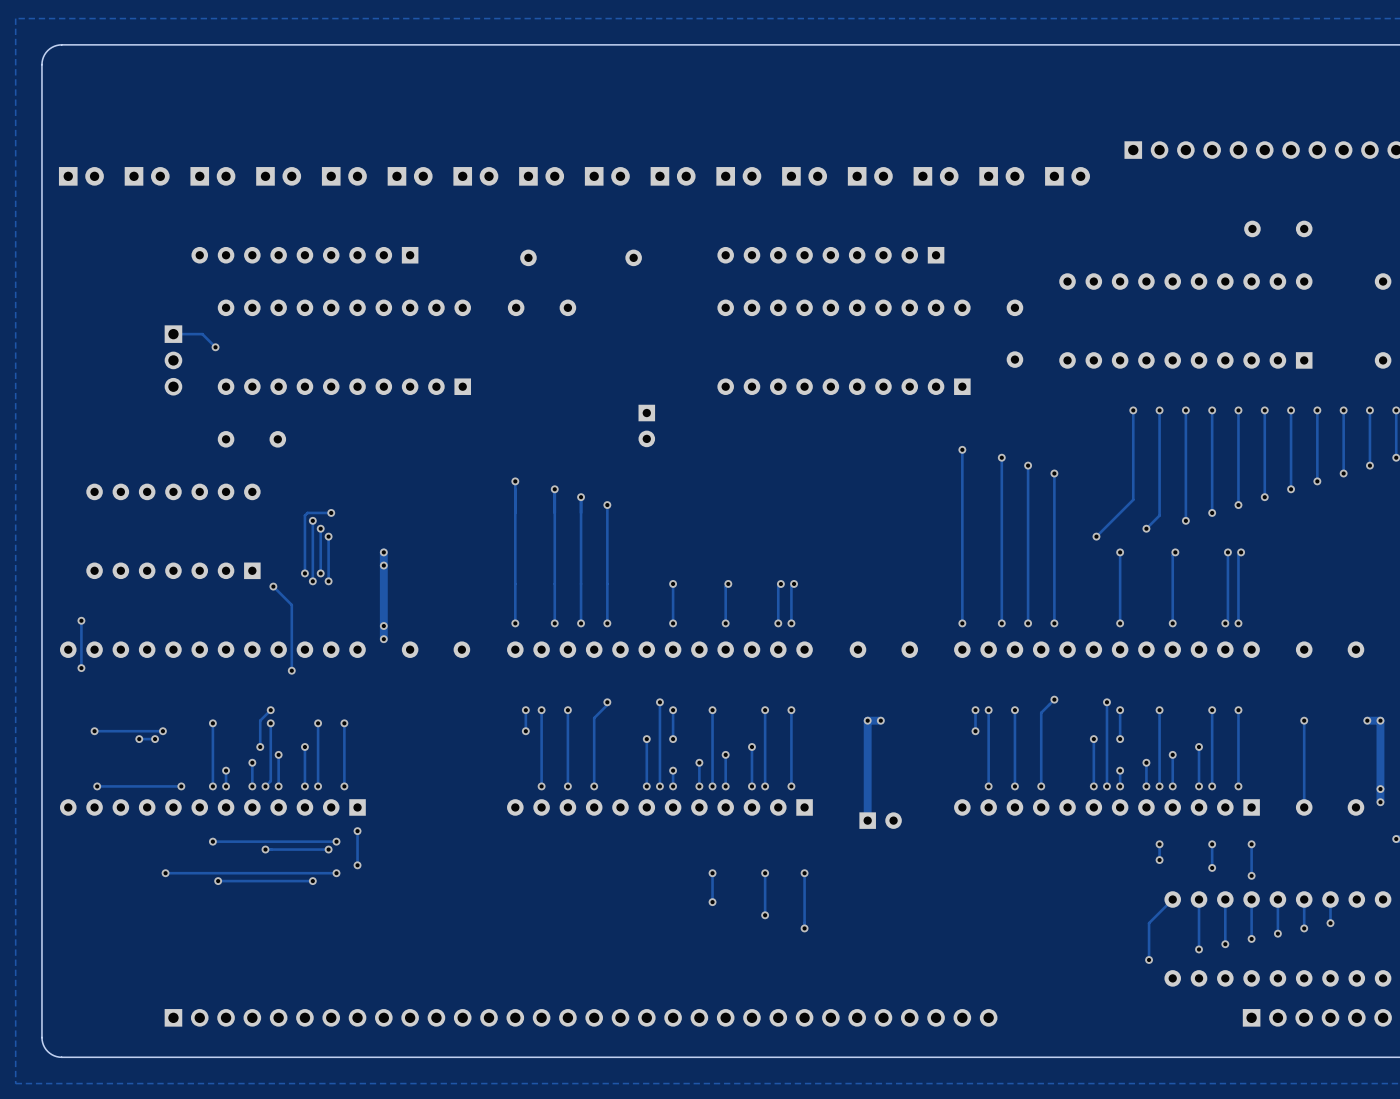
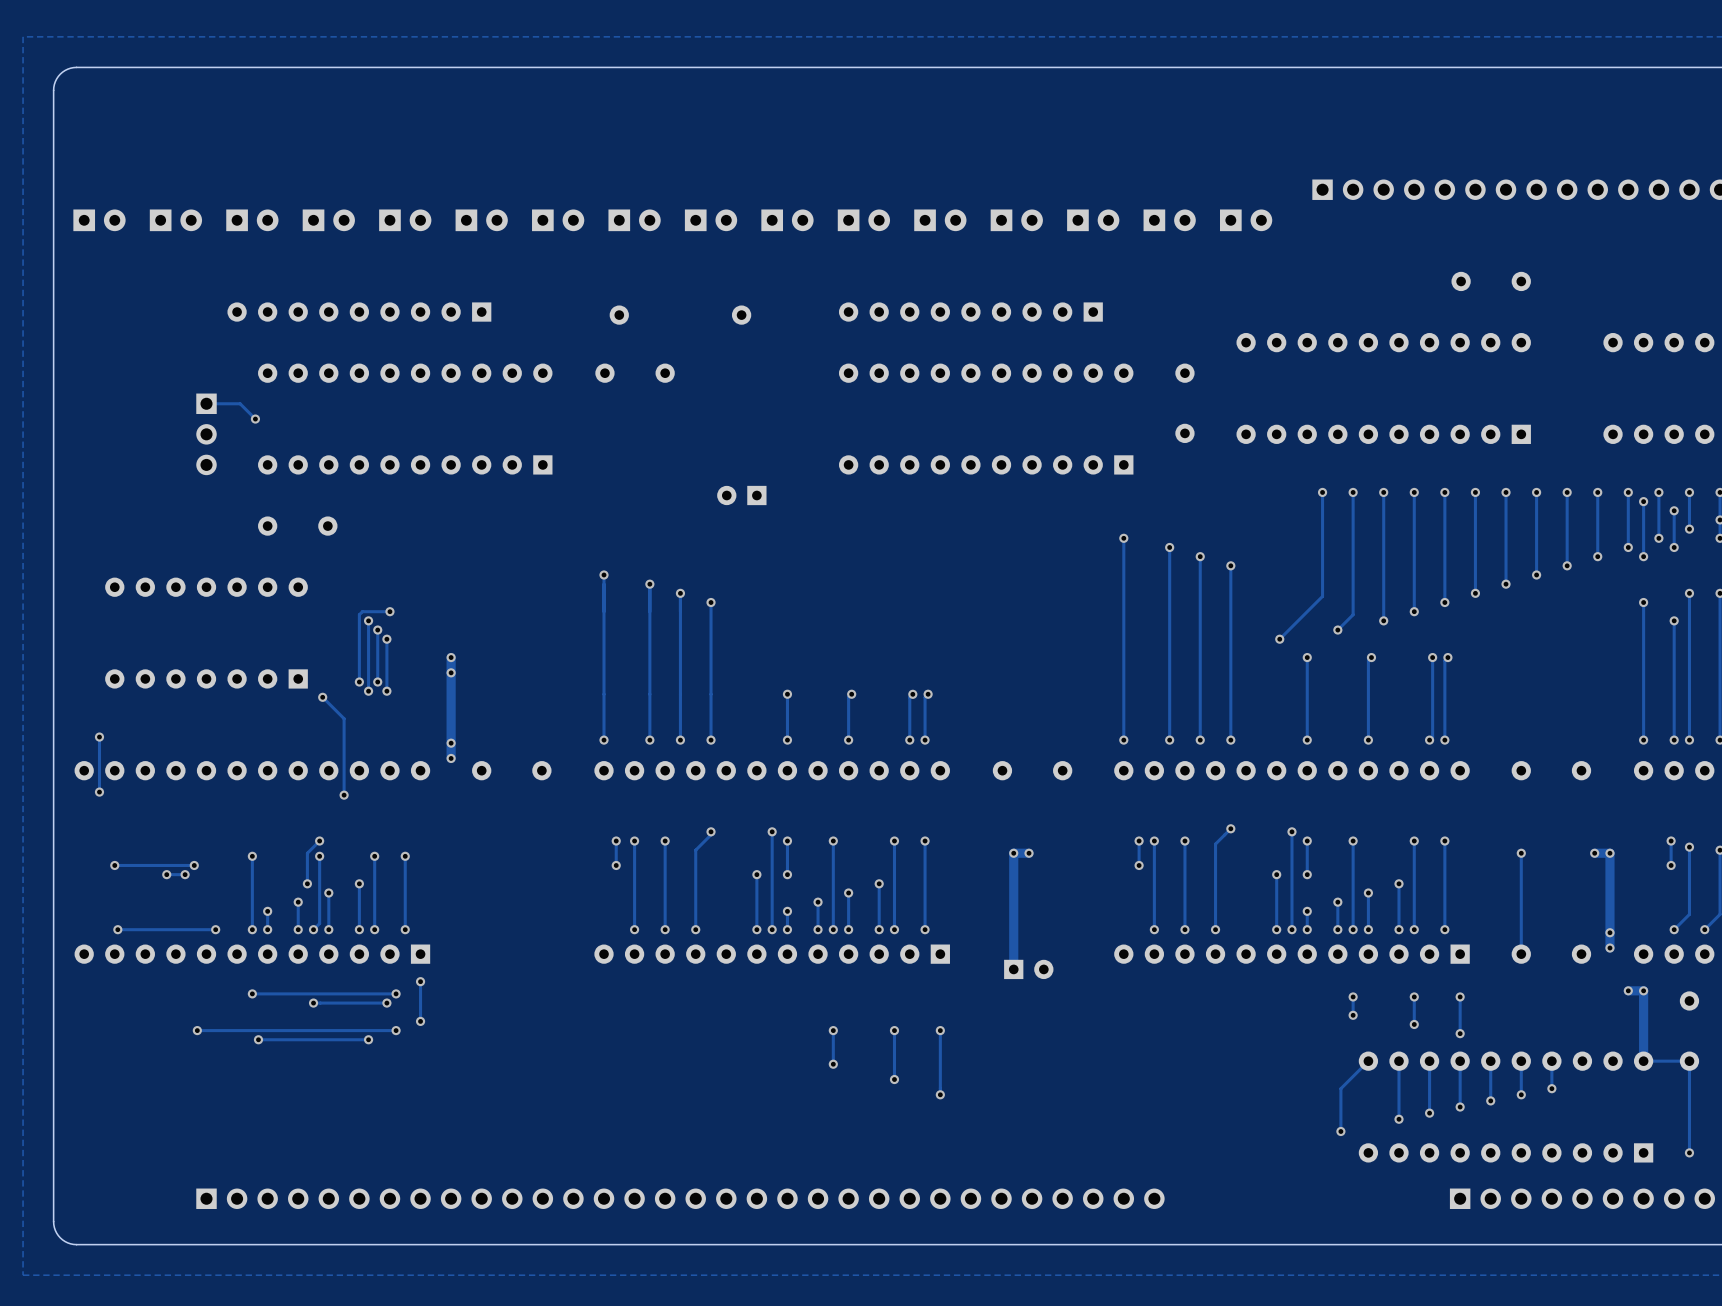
part rotation: 0° (646, 425) -> 90° clockwise (741, 495)

